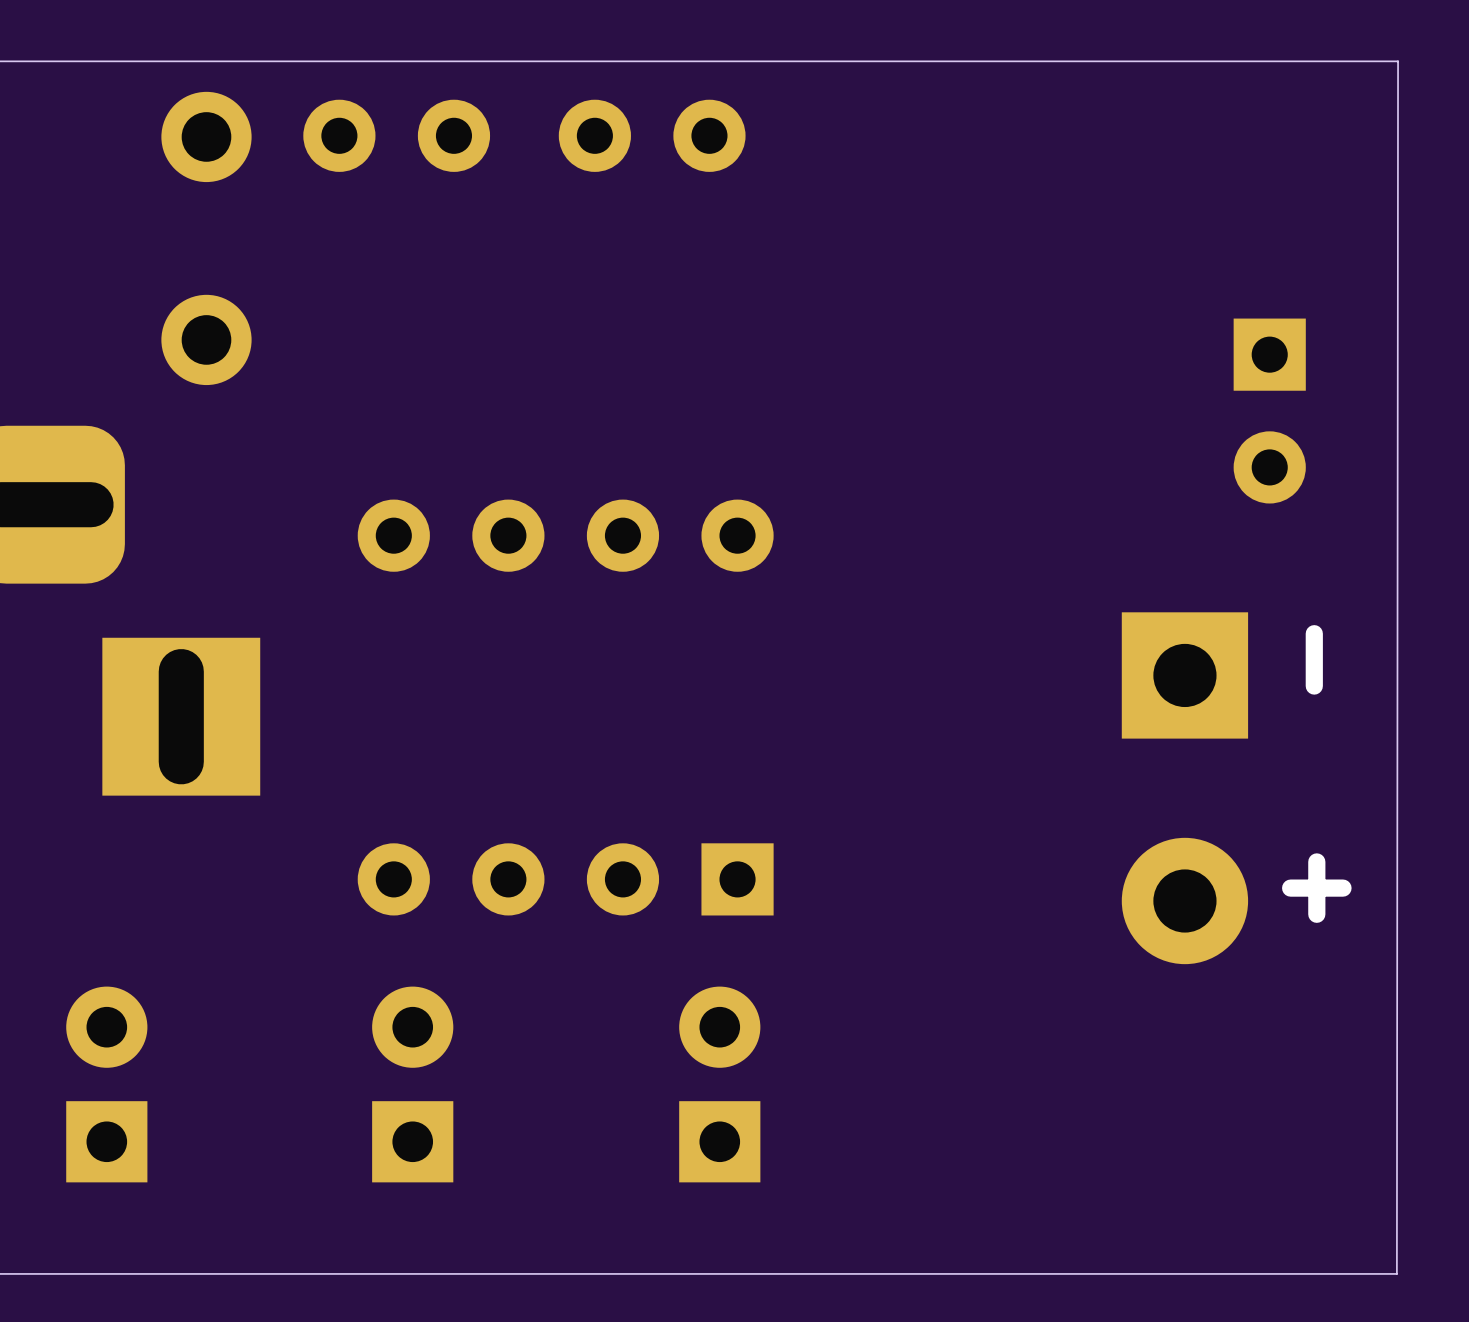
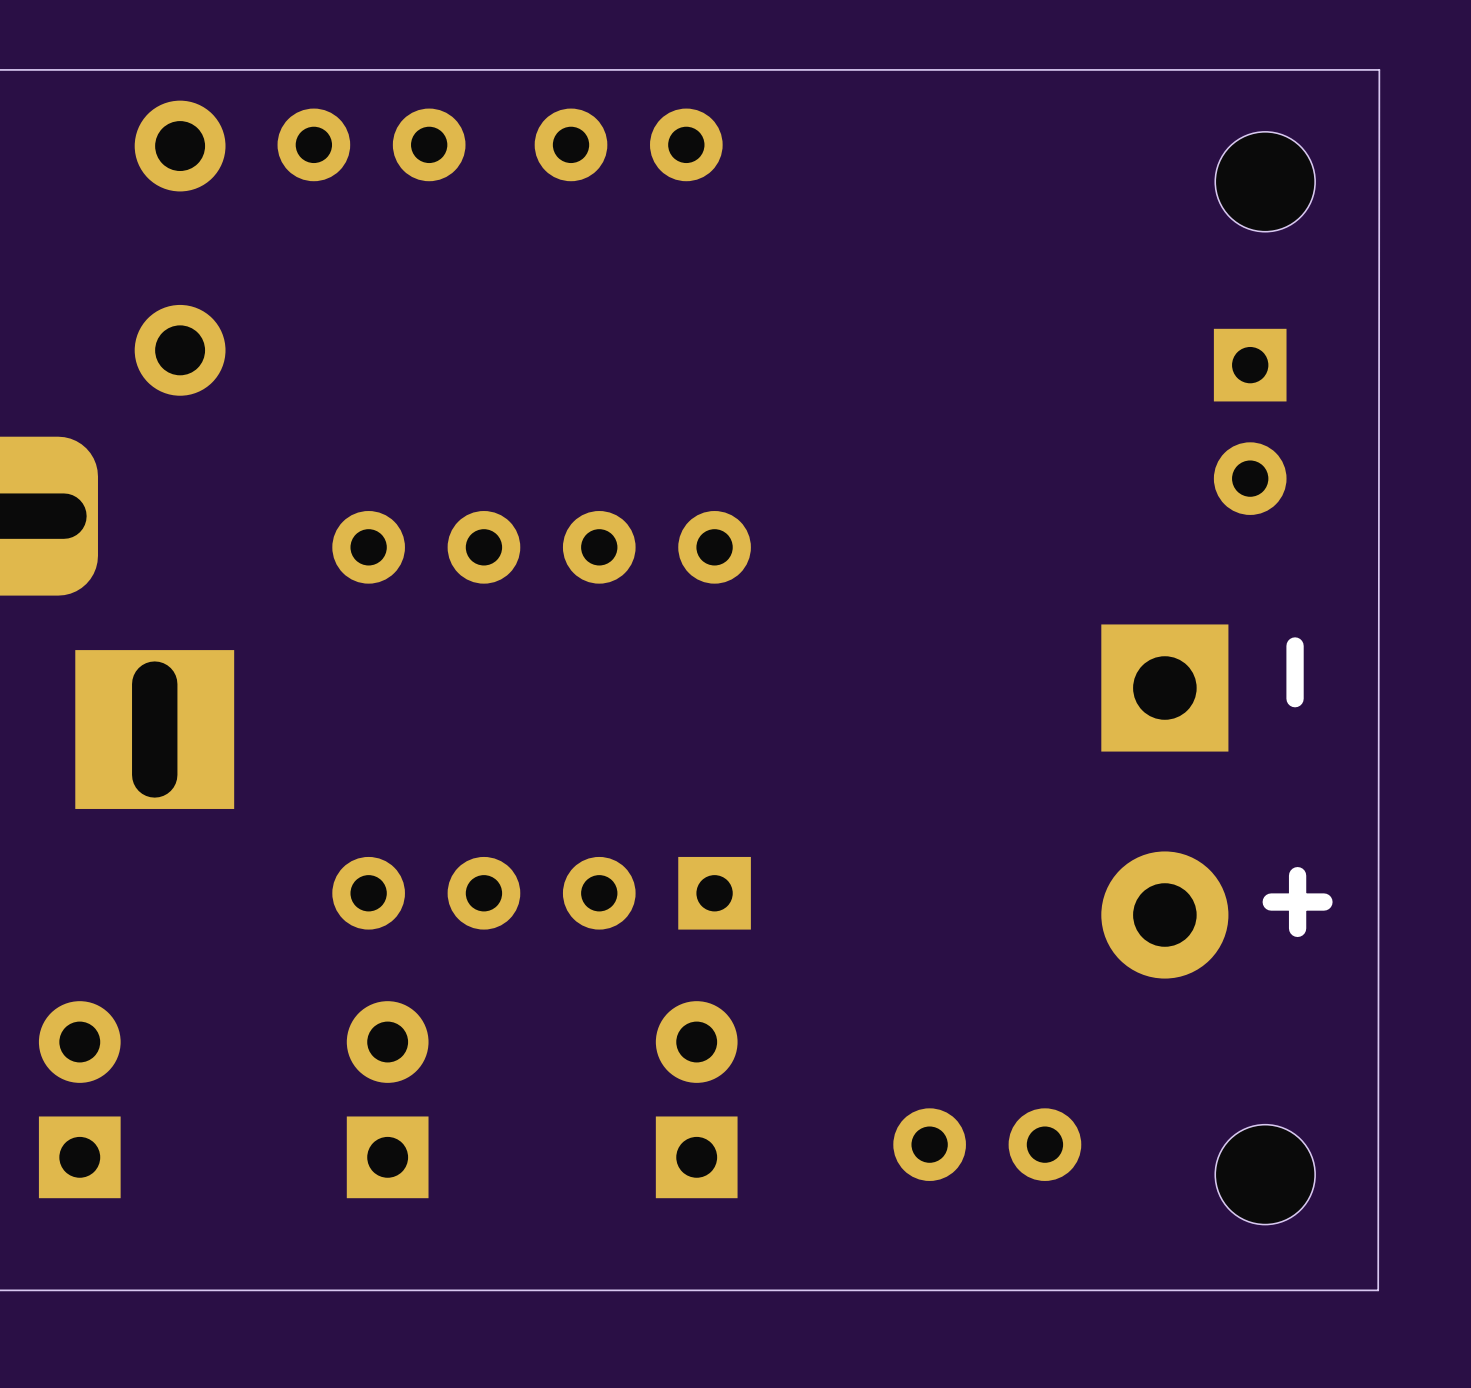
part: none -> (1265, 181)
part: none -> (987, 1144)
part: none -> (1265, 1174)

